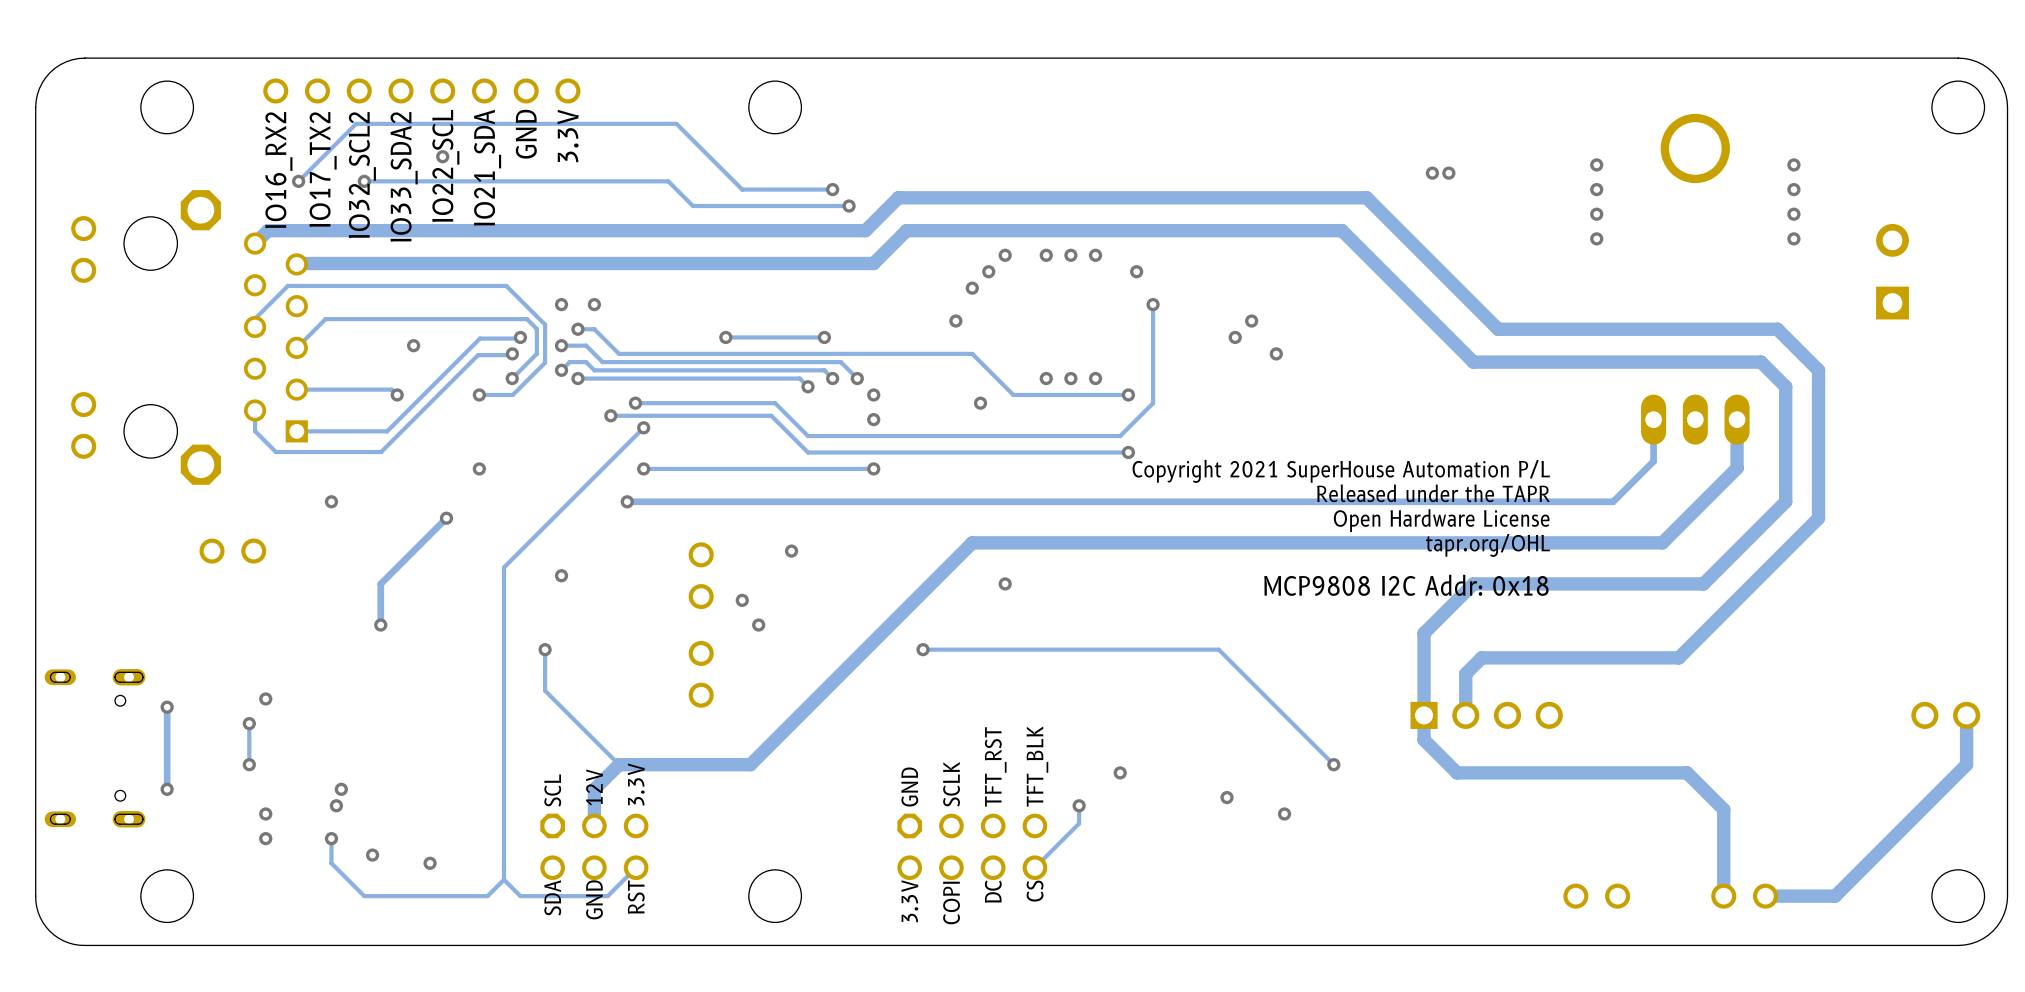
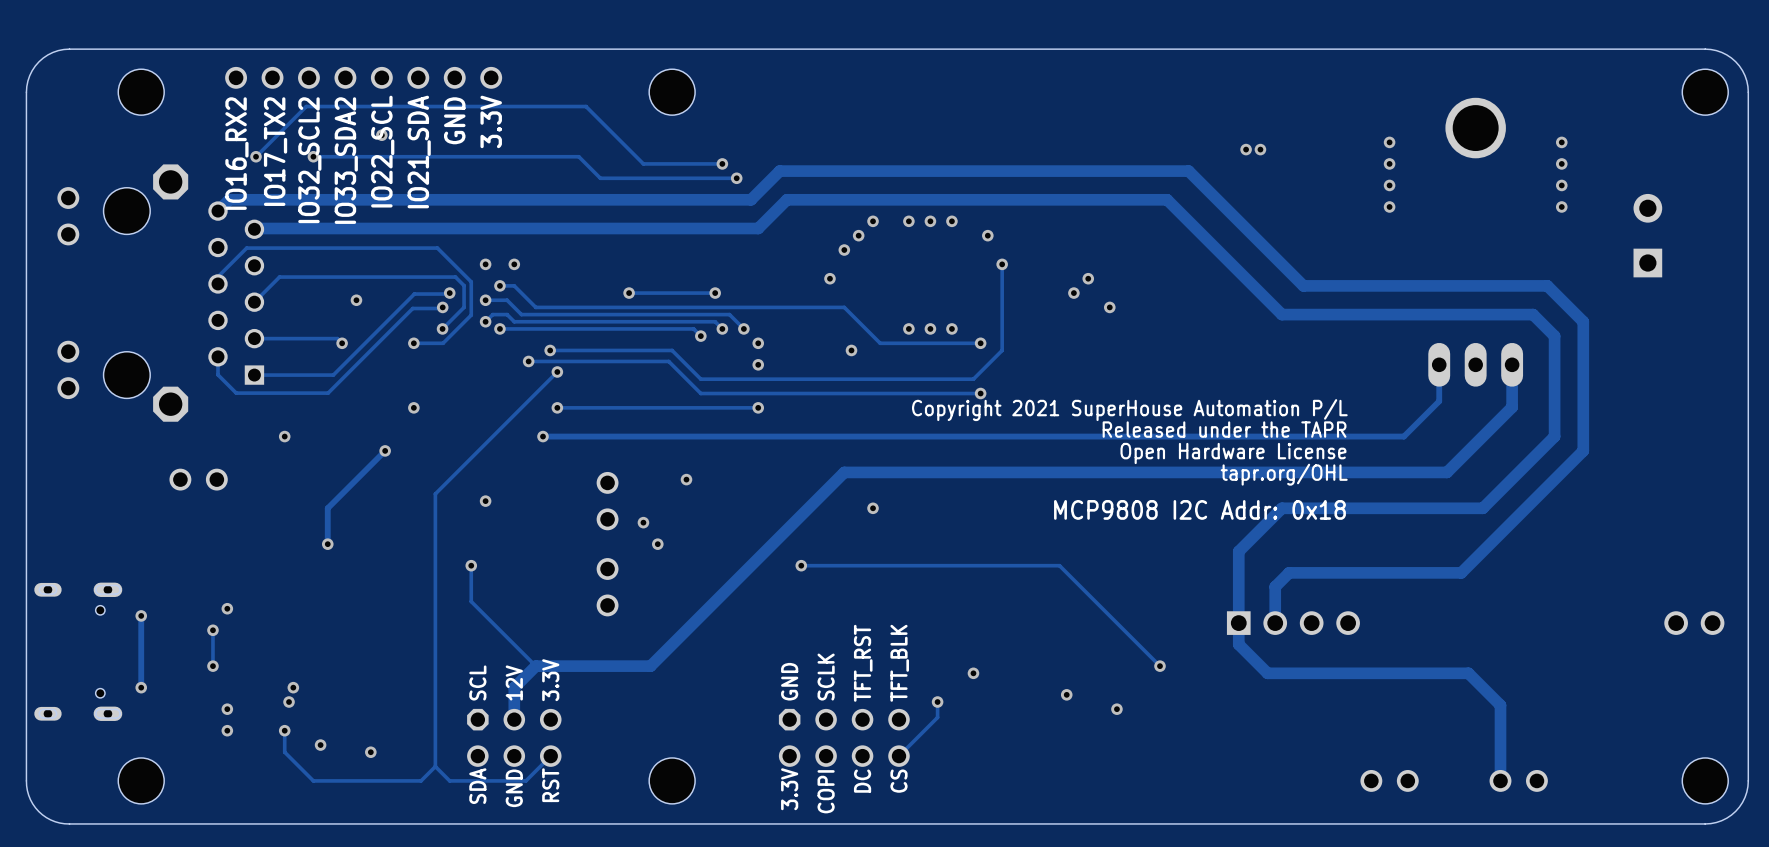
track: (1966, 715) (1966, 764) (1835, 896) (1765, 896) -> none

